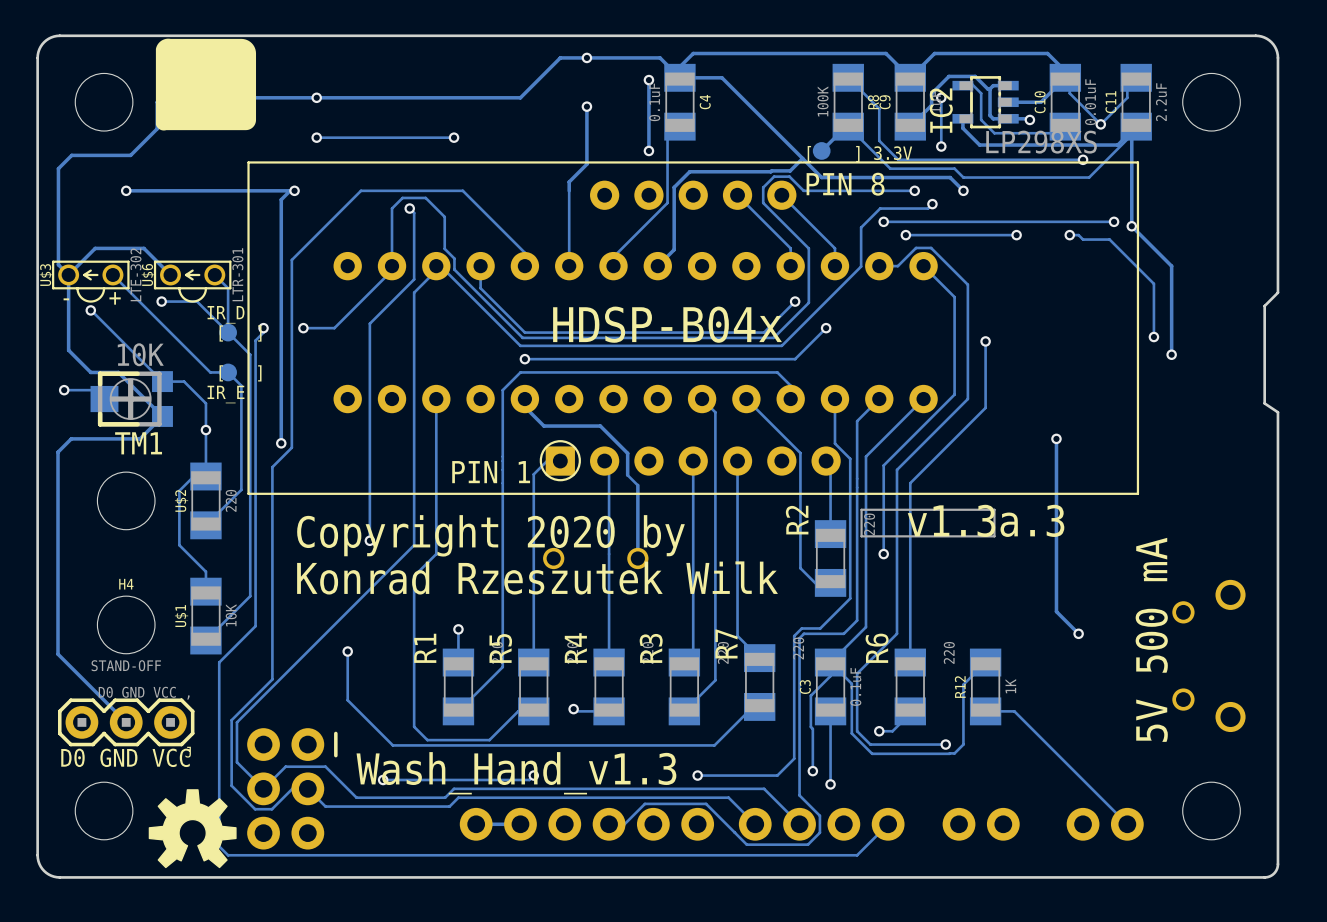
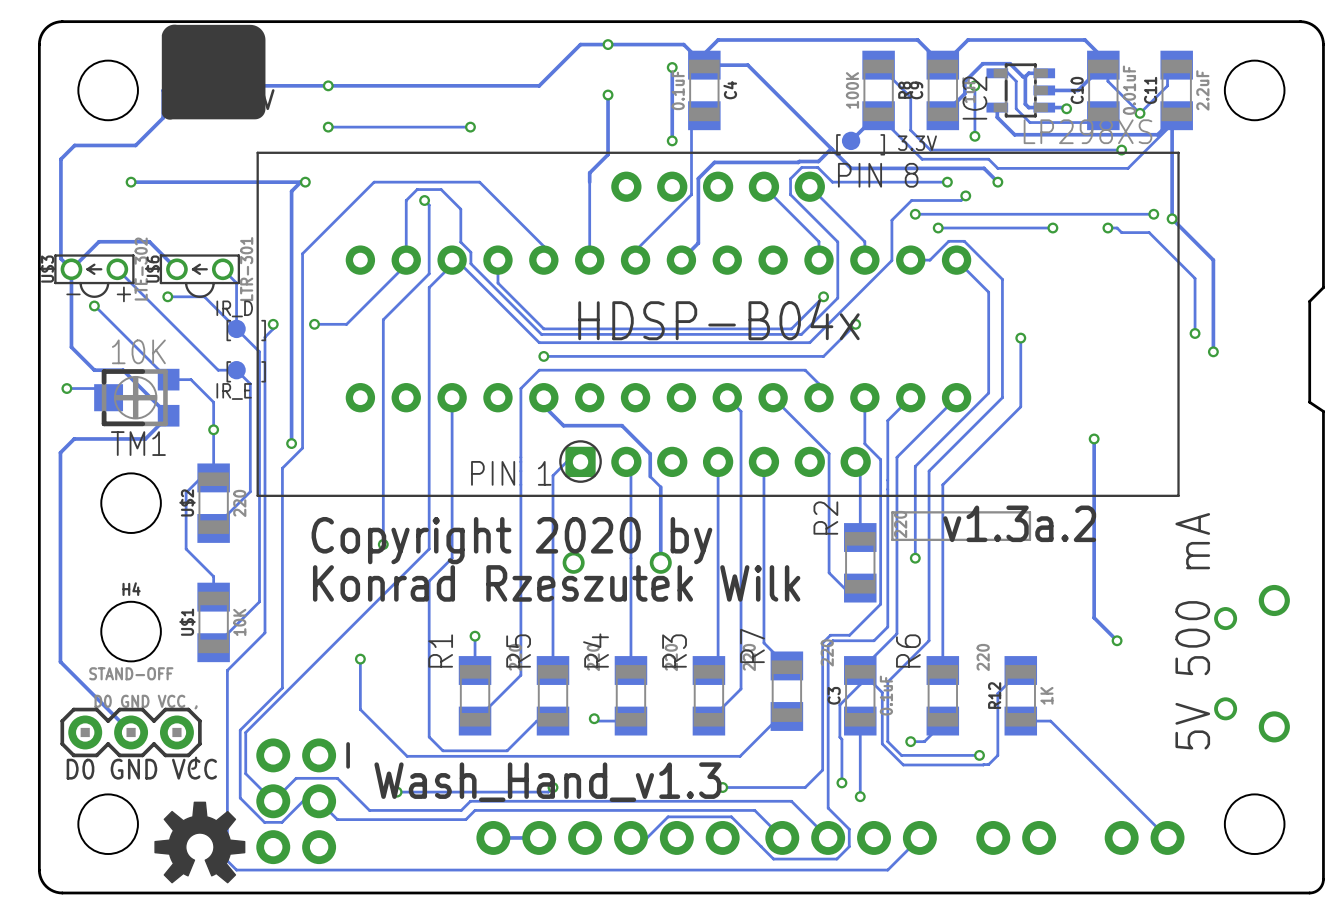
text: v1.3a.3 (986, 520) -> v1.3a.2 (1019, 523)

